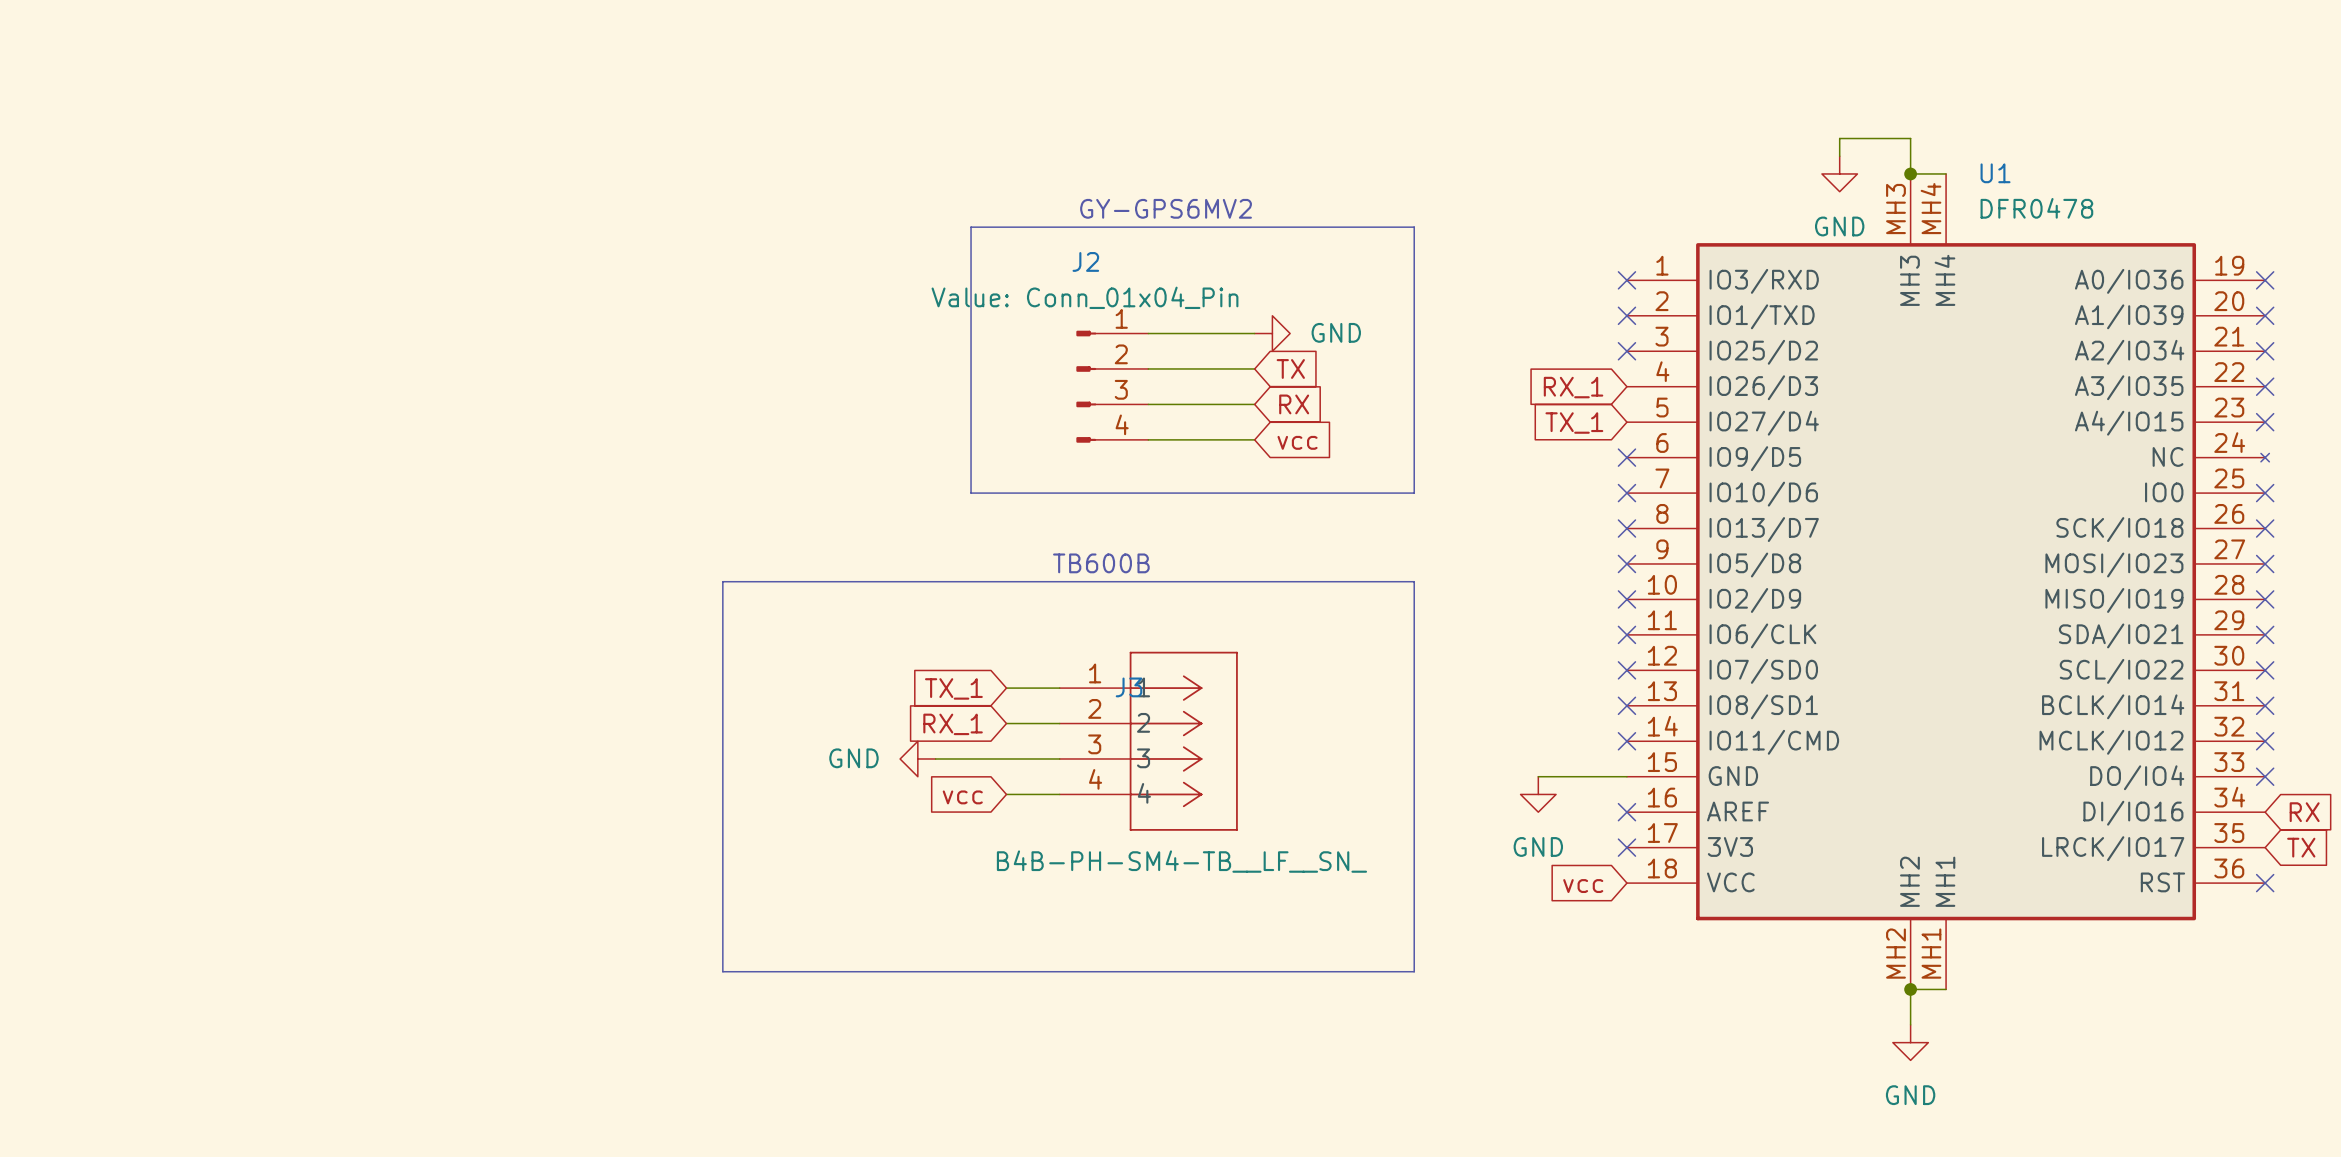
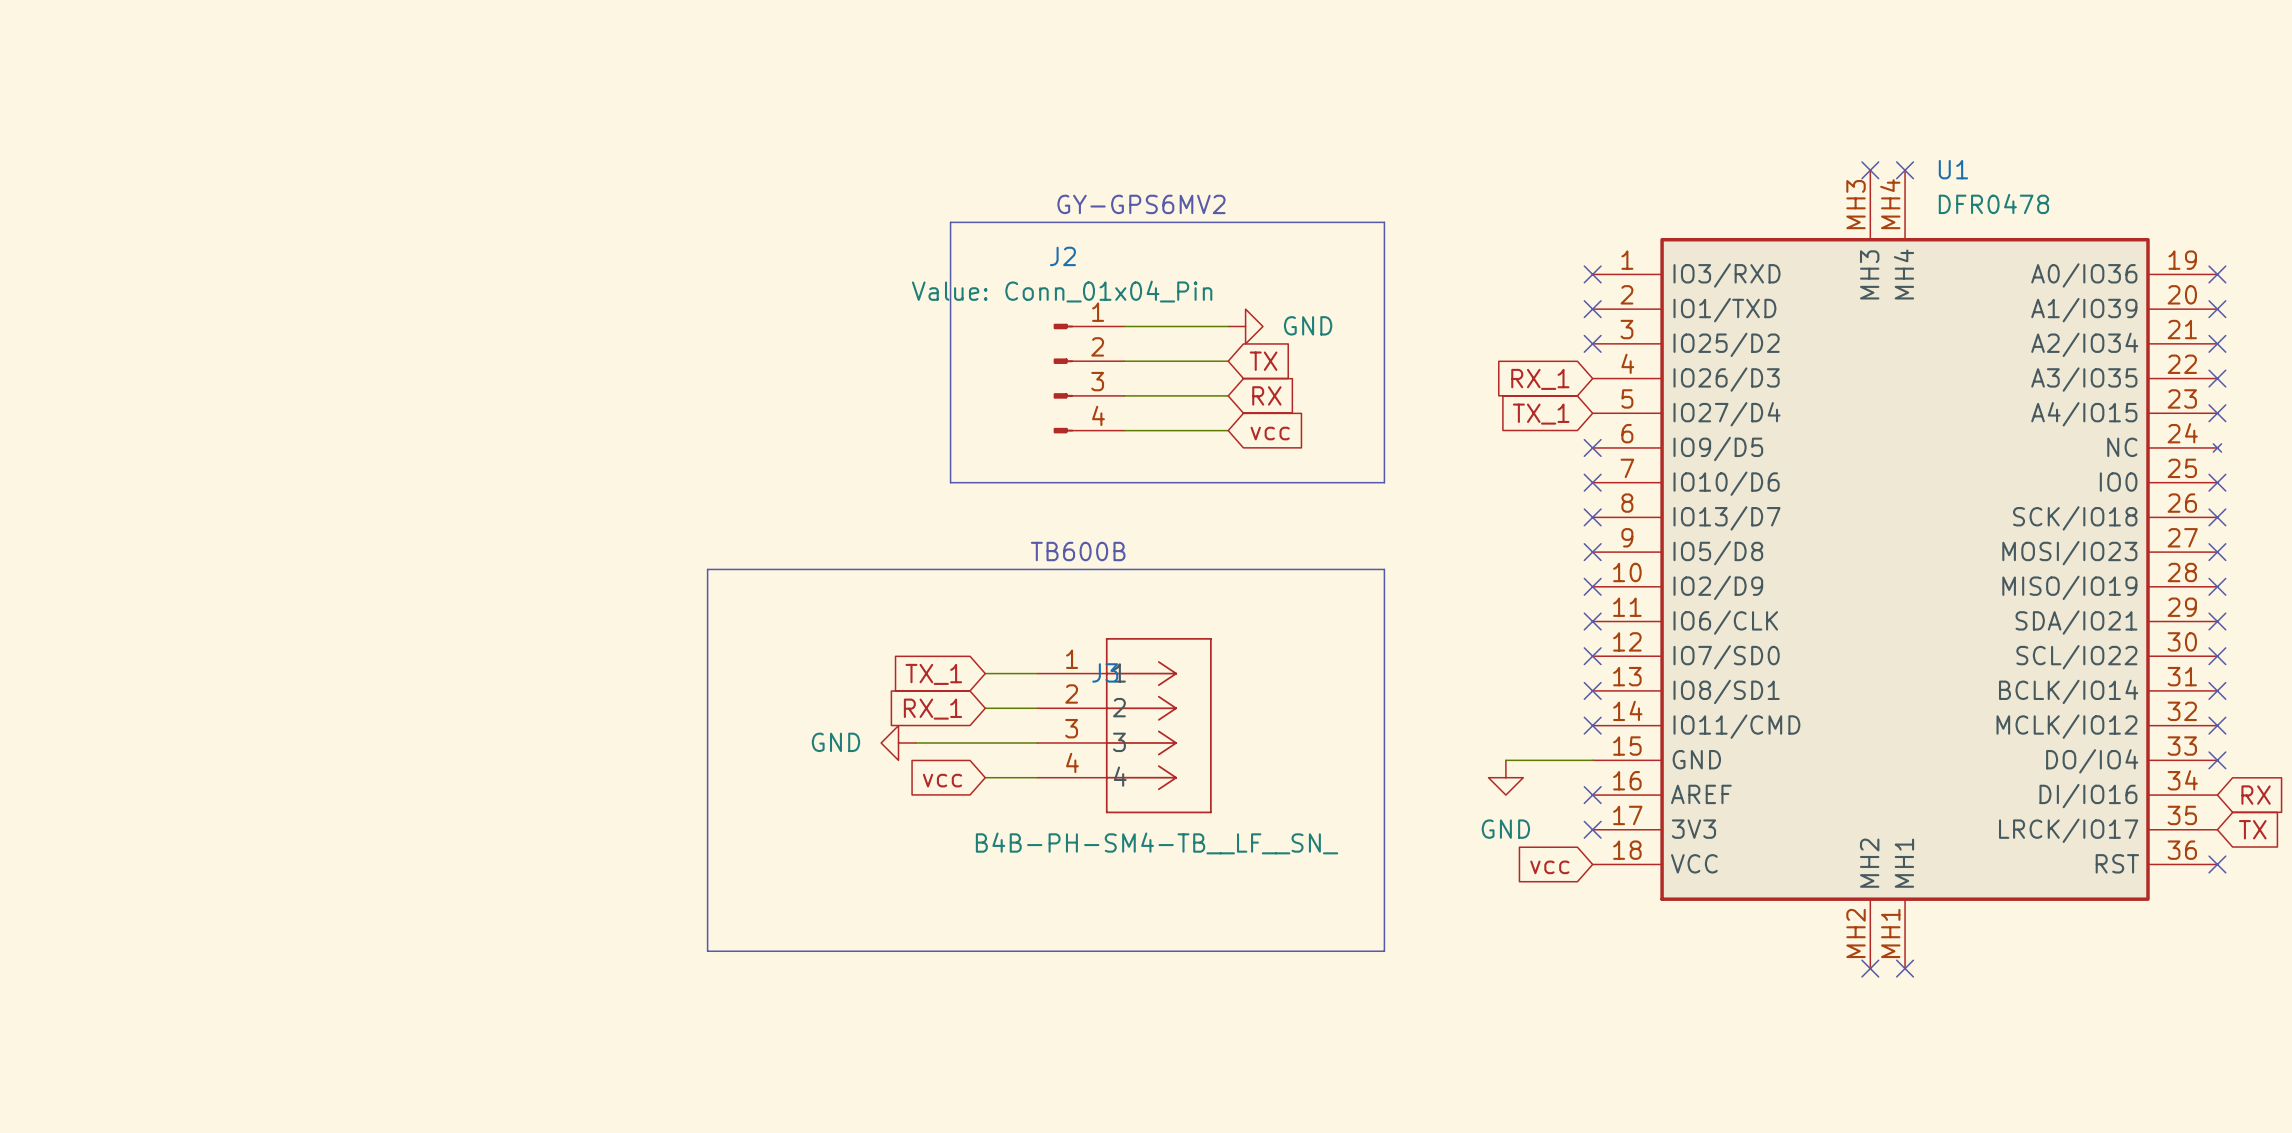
wire: (1839, 156) (1839, 138) (1910, 138) (1910, 173) (1946, 173) -> none
power symbol: GND (1839, 173) -> none
junction: (1910, 173) -> none
no-connect mark: none -> (1870, 170)
no-connect mark: none -> (1905, 170)
junction: (1910, 989) -> none
no-connect mark: none -> (1870, 968)
wire: (1946, 989) (1910, 989) (1910, 1024) -> none
no-connect mark: none -> (1905, 968)
power symbol: GND (1910, 1042) -> none

